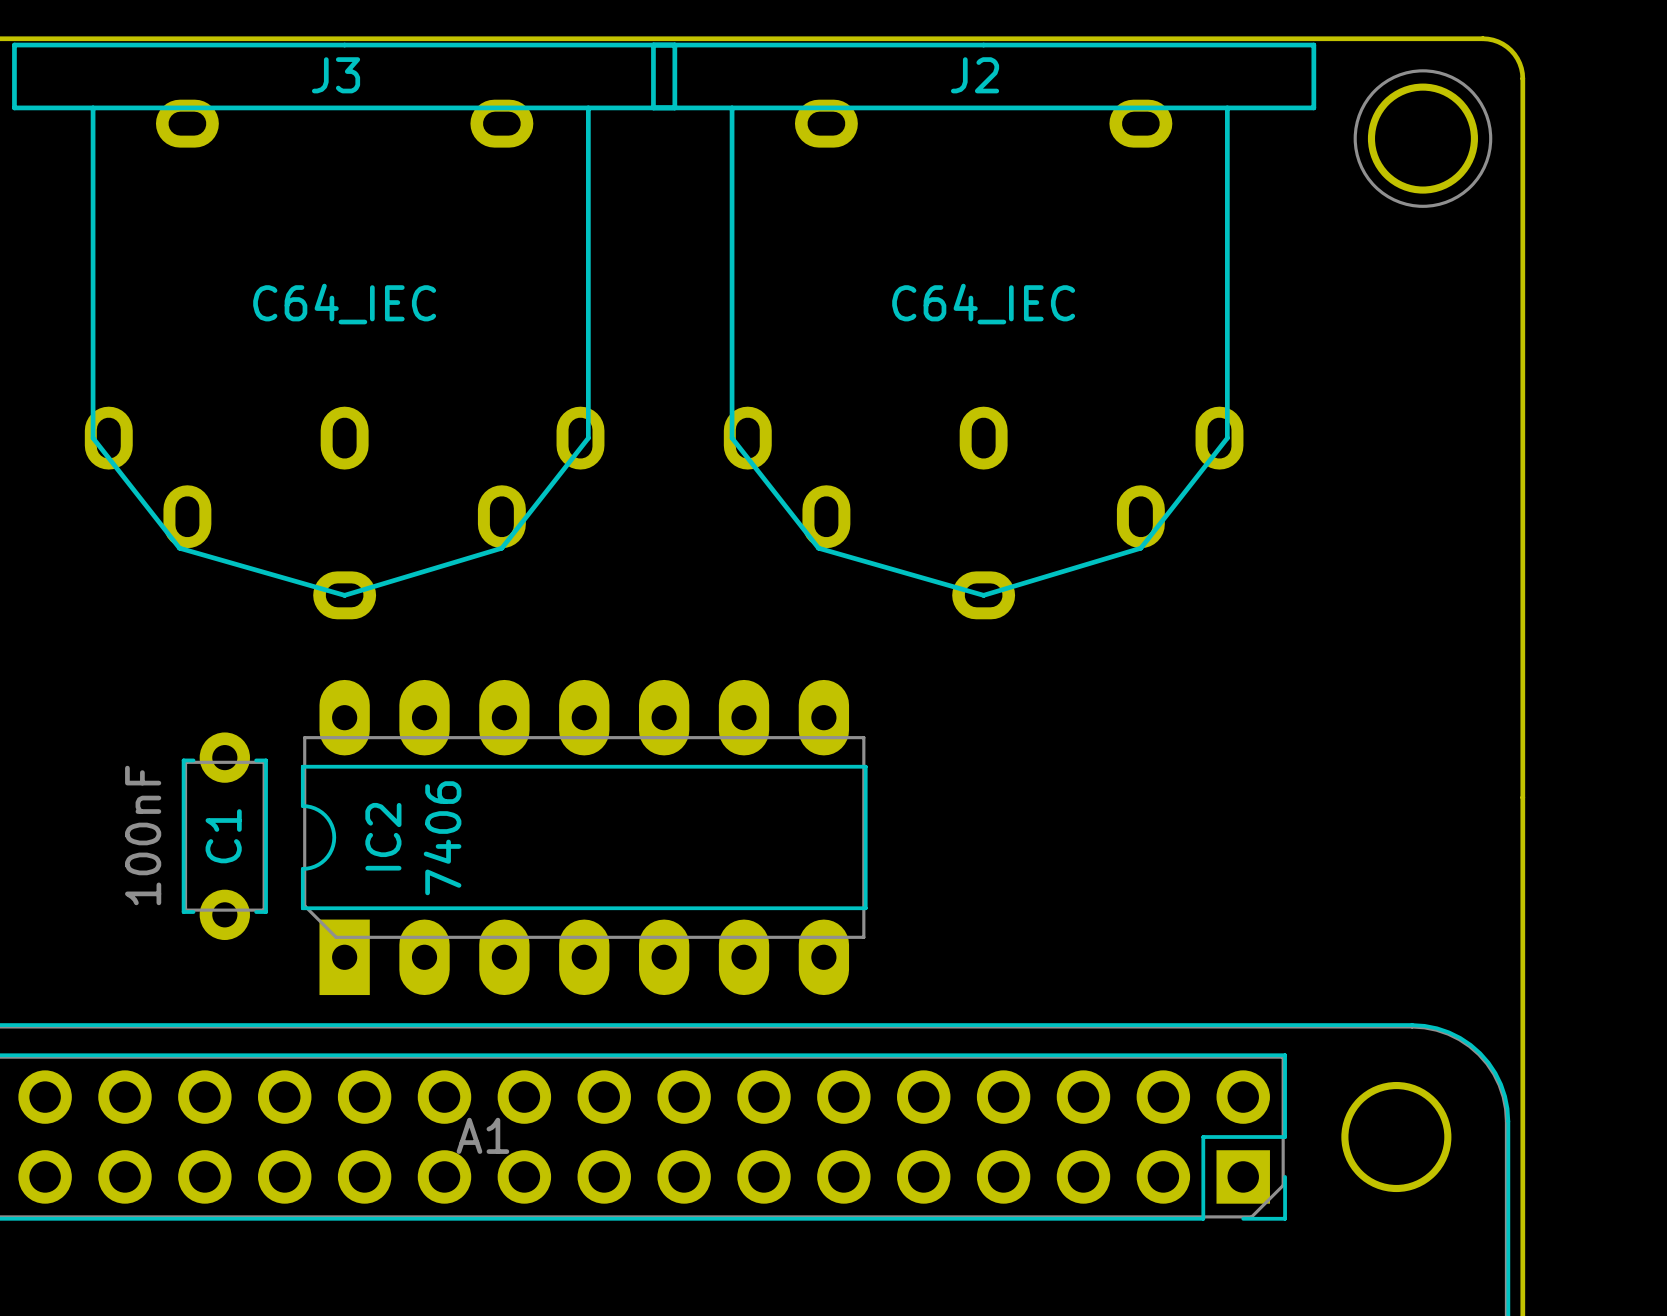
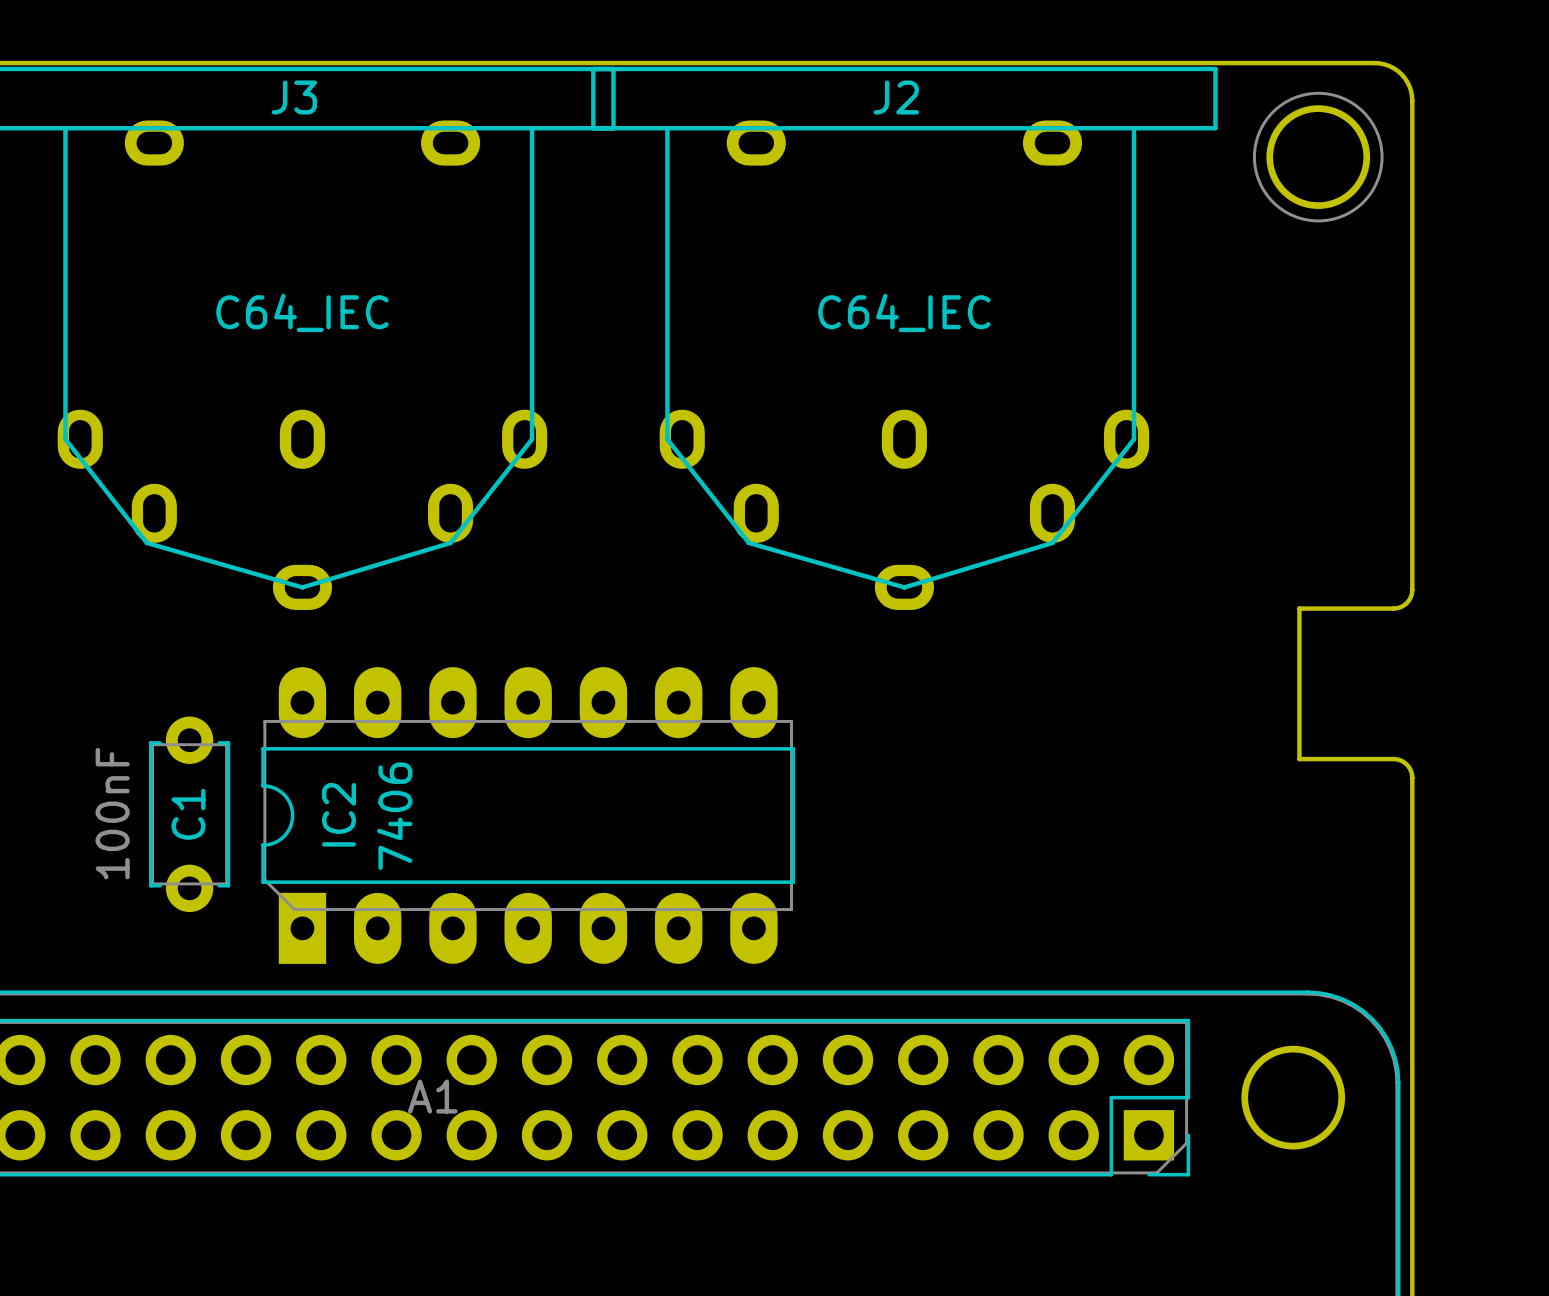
board edge: (1522, 597) (1522, 797) -> (1412, 589) (1406, 603) (1395, 608) (1299, 608) (1299, 759) (1393, 759)
board edge: none -> (1393, 759) (1406, 764) (1412, 777)

